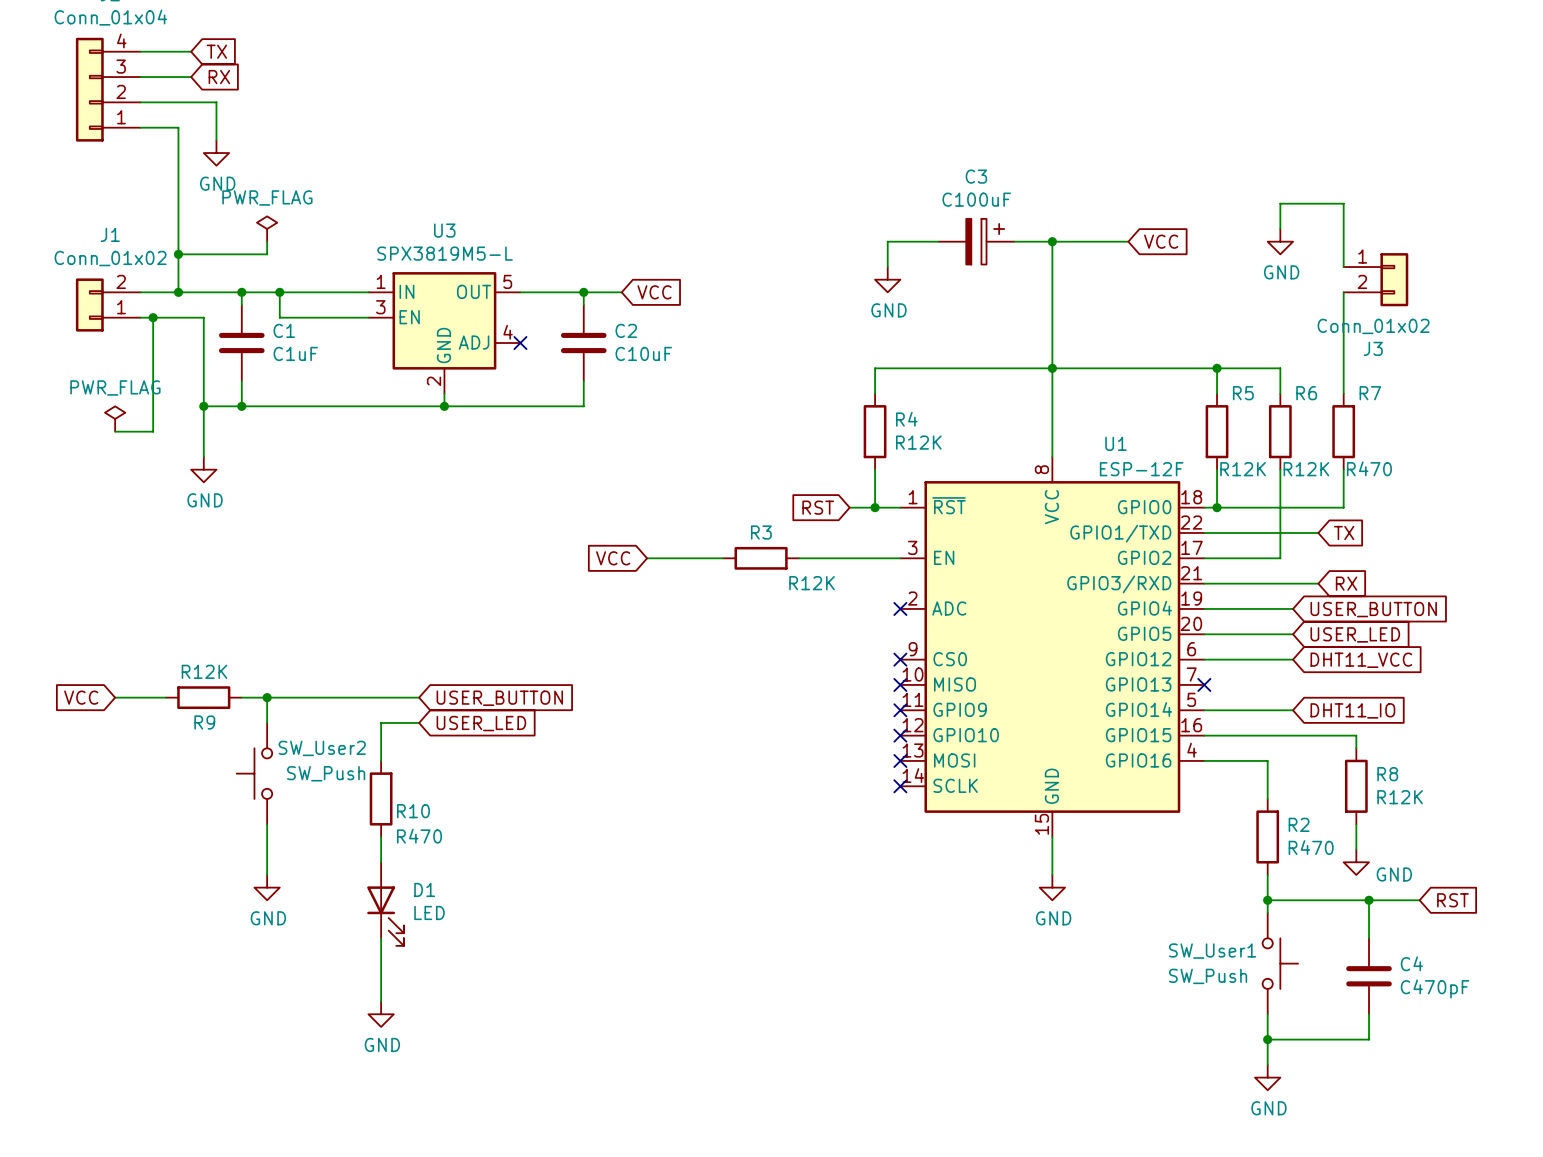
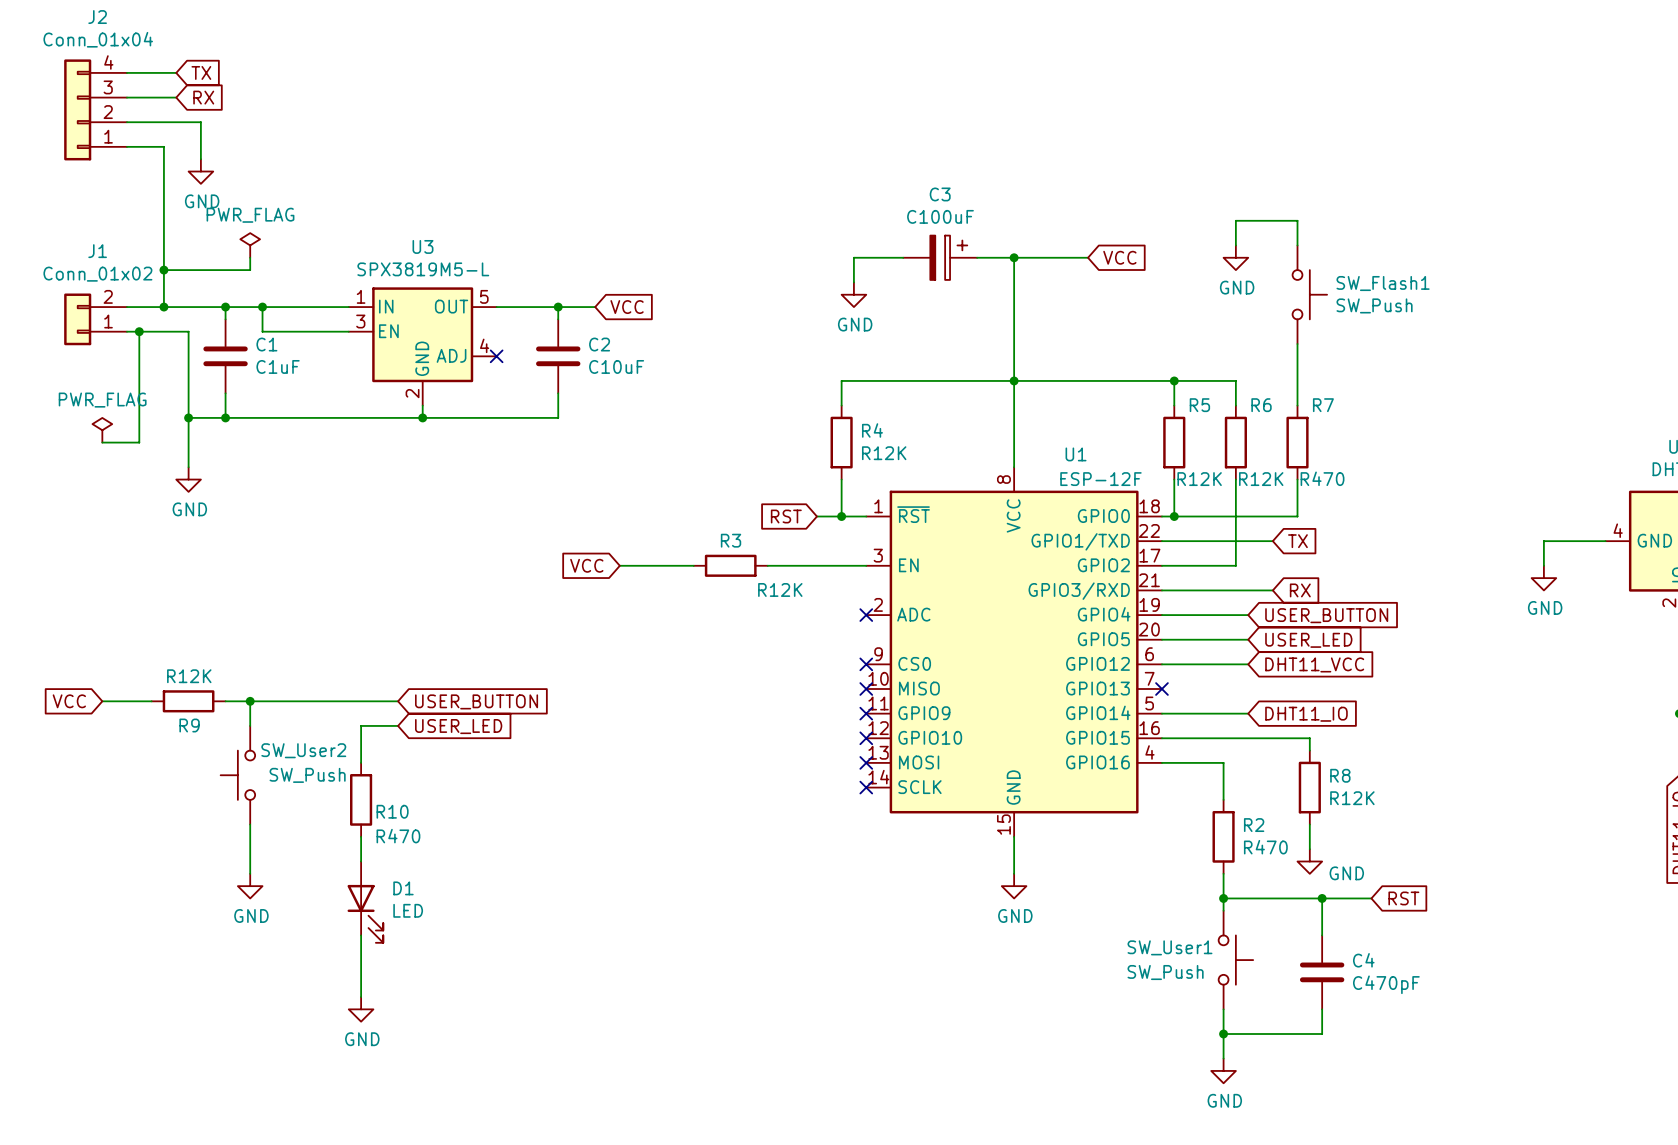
SW_Flash1: none -> SW_Push (1309, 294)
J3: Conn_01x02 (1375, 279) -> none

